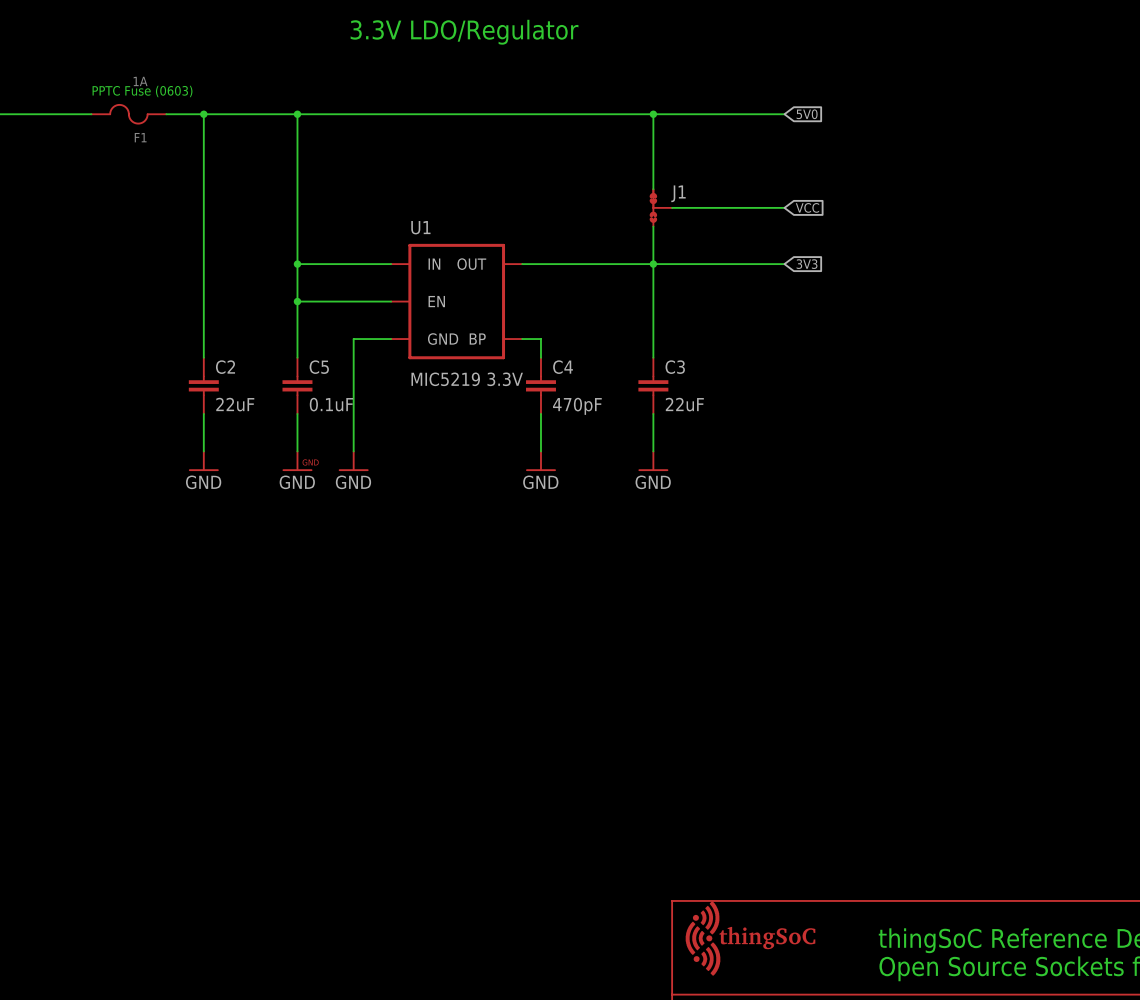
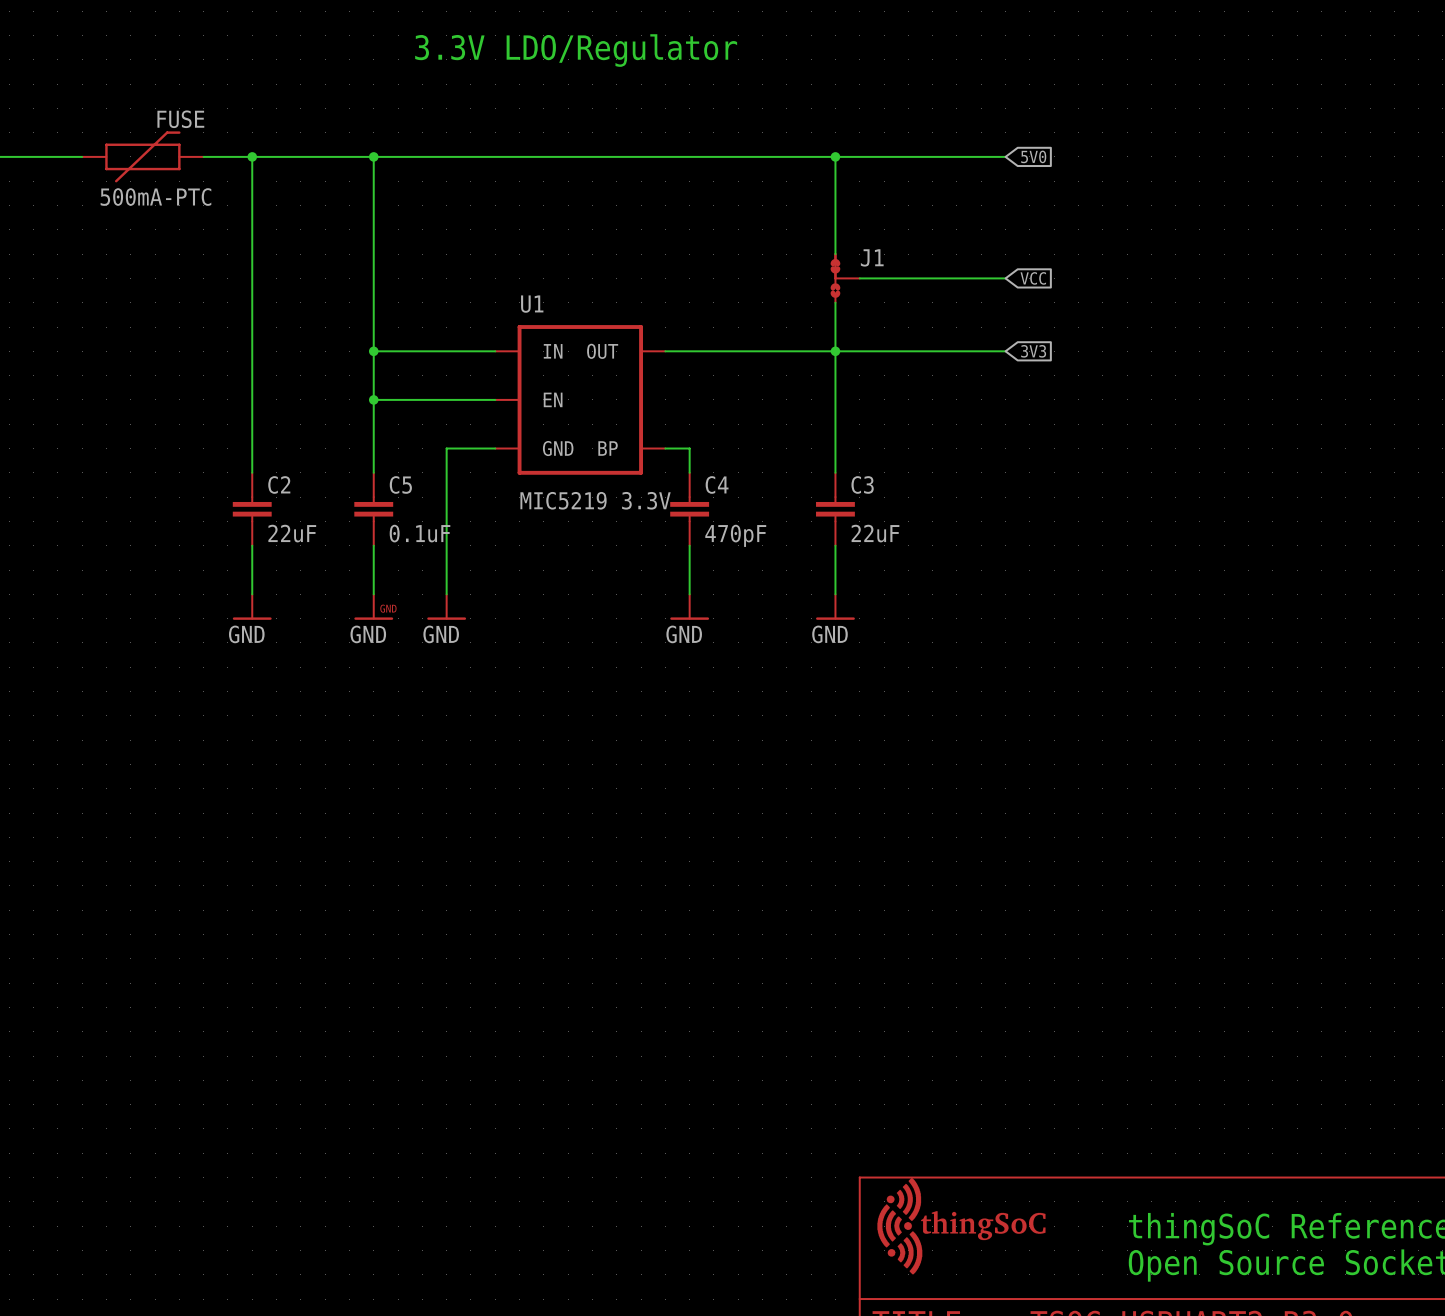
text: PPTC Fuse (0603) (142, 91) -> none
FUSE: none -> 500mA-PTC (142, 156)
F1: 1A (128, 114) -> none

